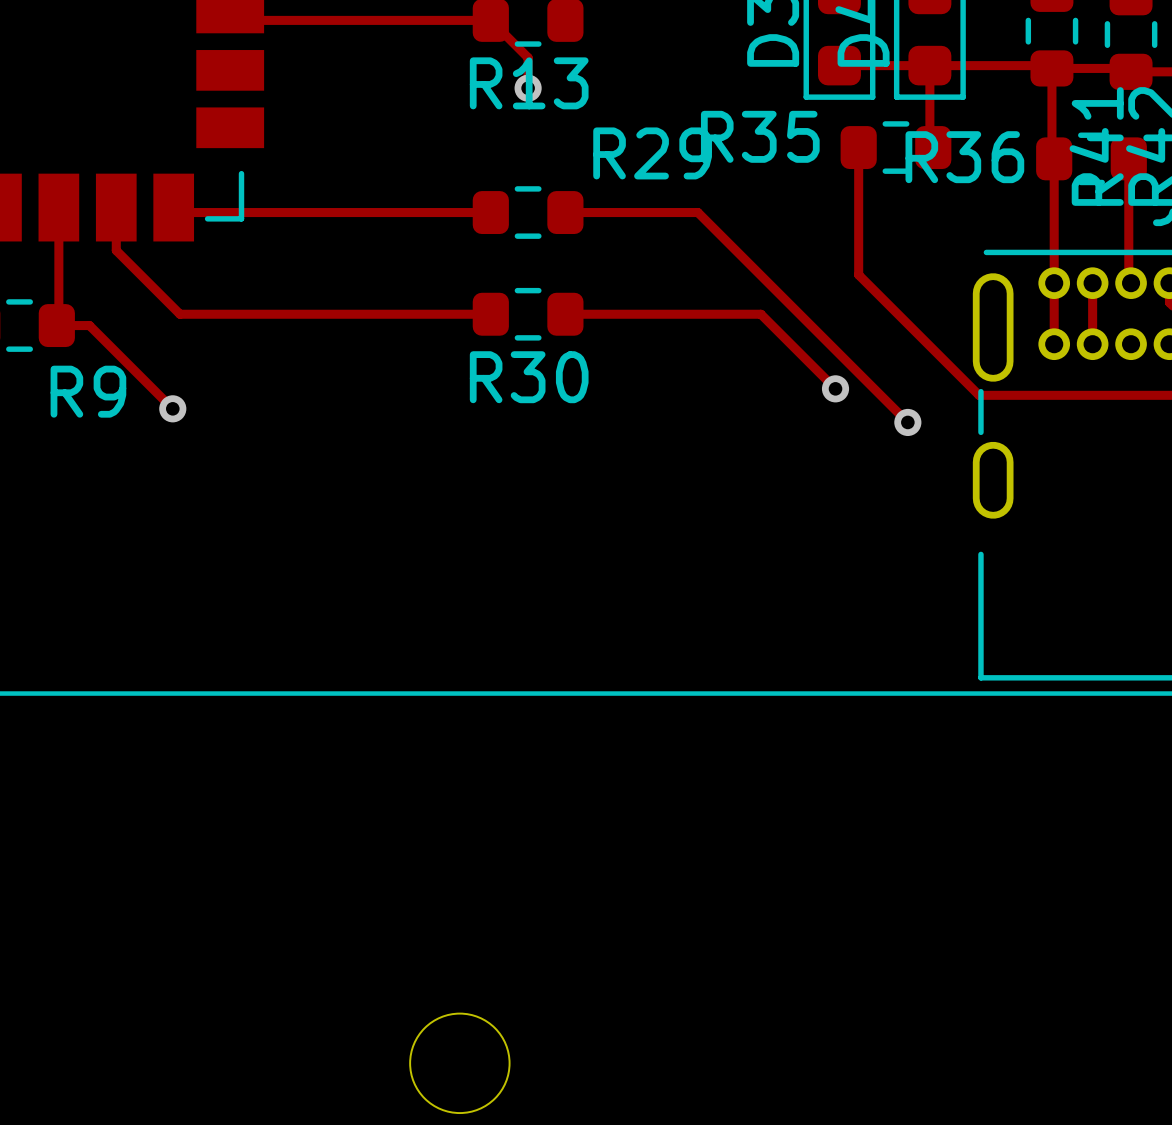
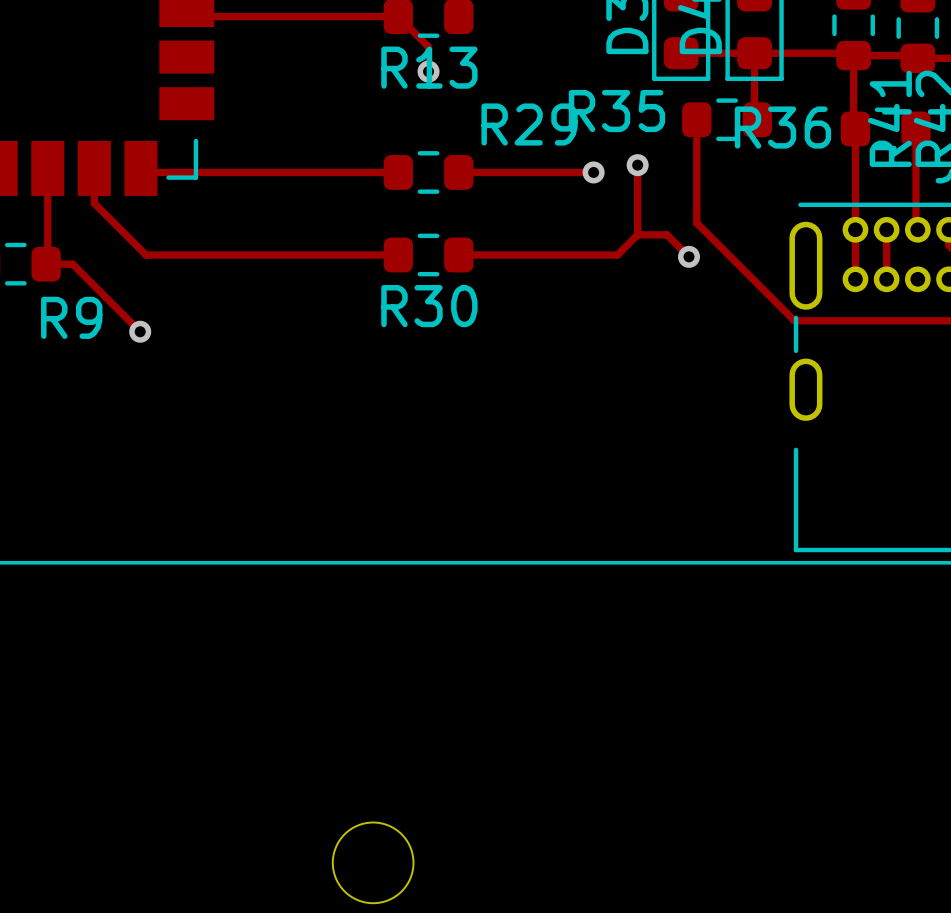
track: none -> (637, 165) (637, 234)
via: none -> (637, 165)
track: (697, 212) (907, 422) -> (566, 172) (593, 172)
via: none -> (593, 172)
track: none -> (637, 234) (666, 234) (689, 256)
track: (760, 314) (835, 388) -> (617, 255) (637, 234)
via: none -> (689, 256)
via: (835, 388) -> none
via: (907, 422) -> none

